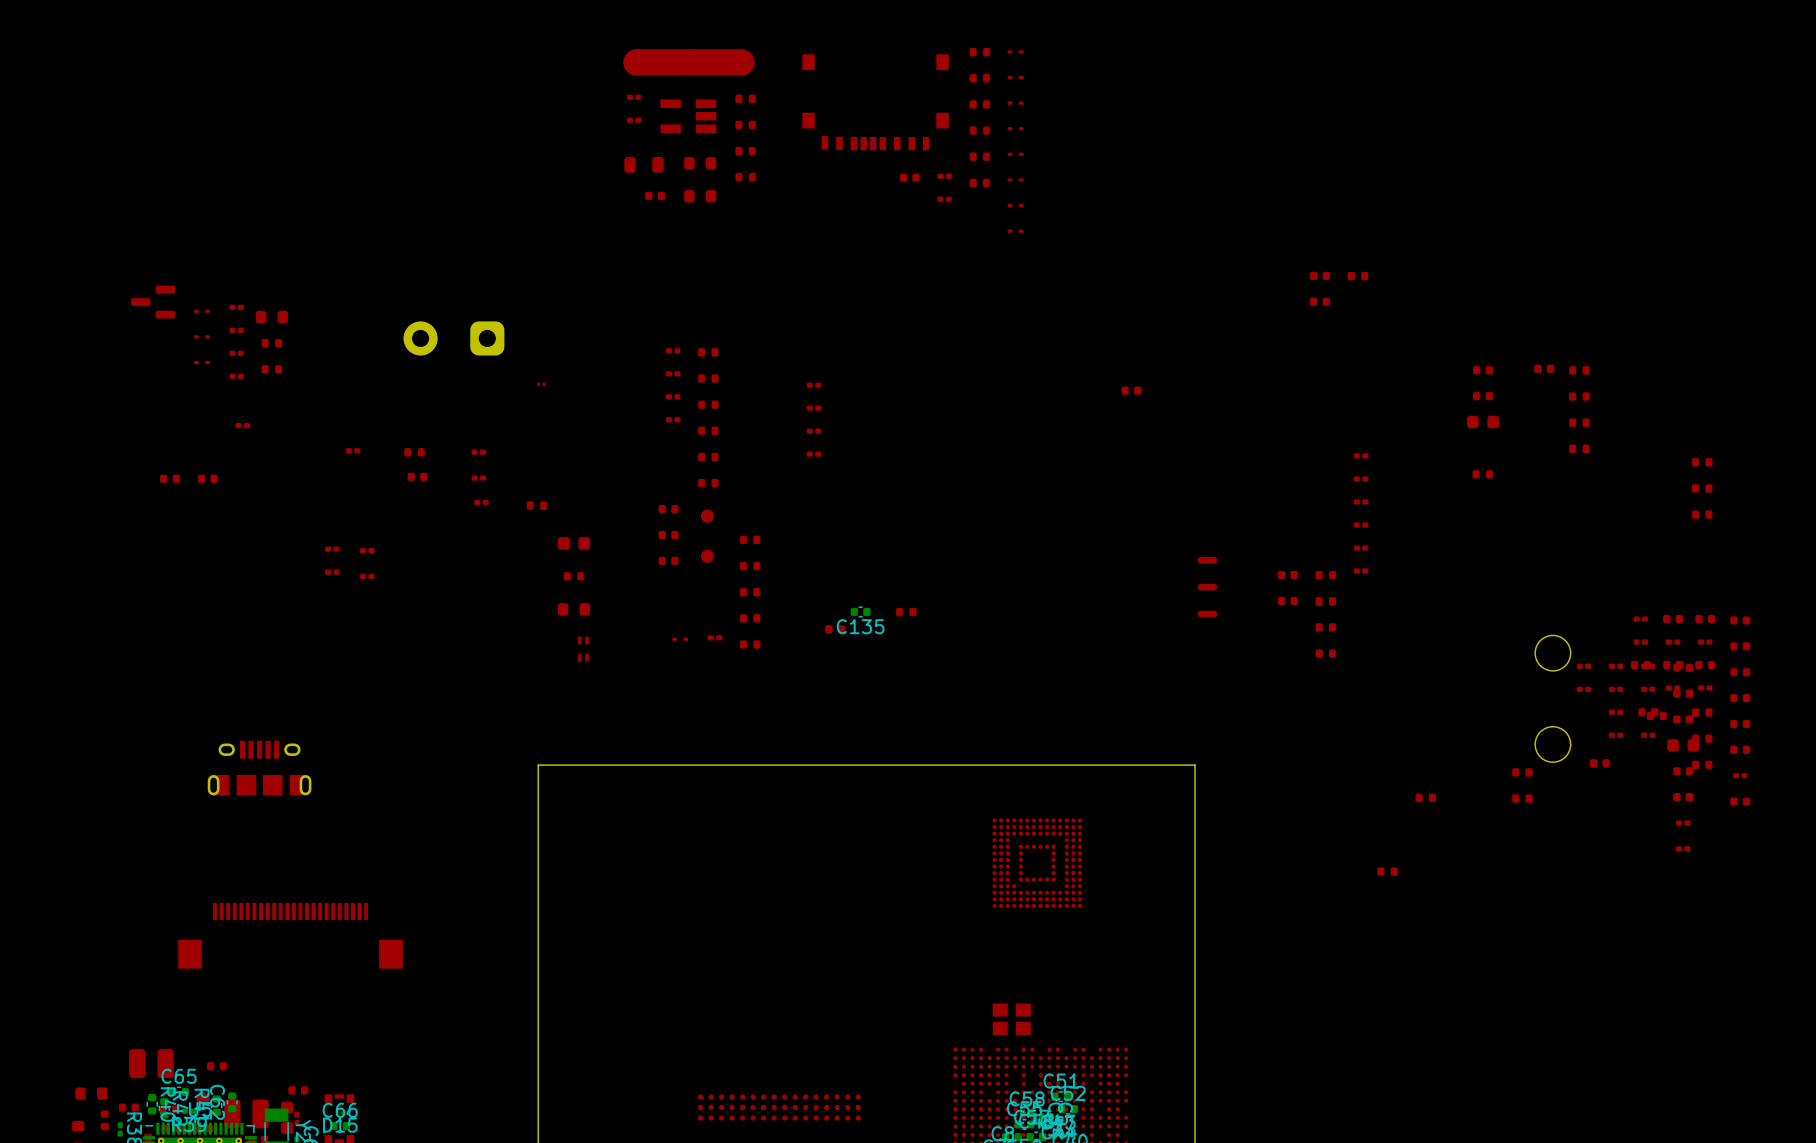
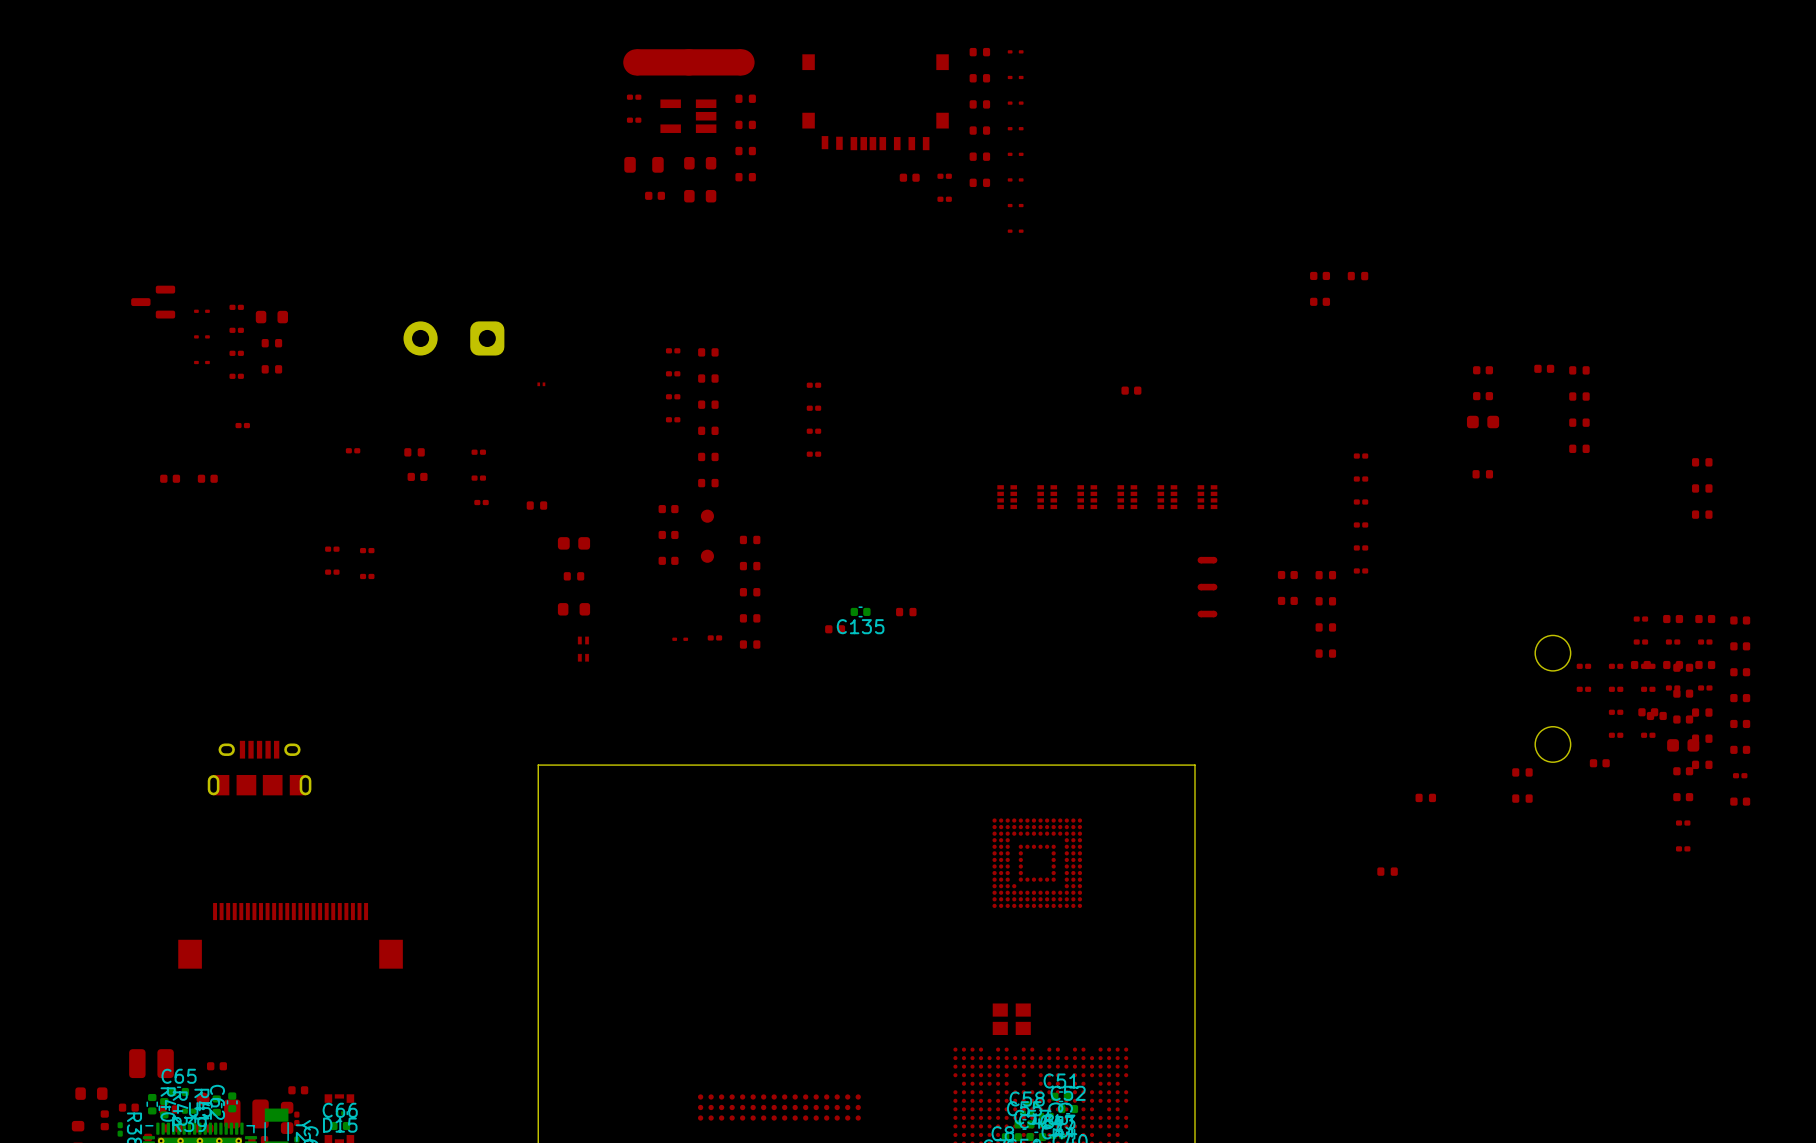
part: none -> (1007, 497)
part: none -> (1047, 497)
part: none -> (1087, 497)
part: none -> (1127, 497)
part: none -> (1167, 497)
part: none -> (1207, 497)

